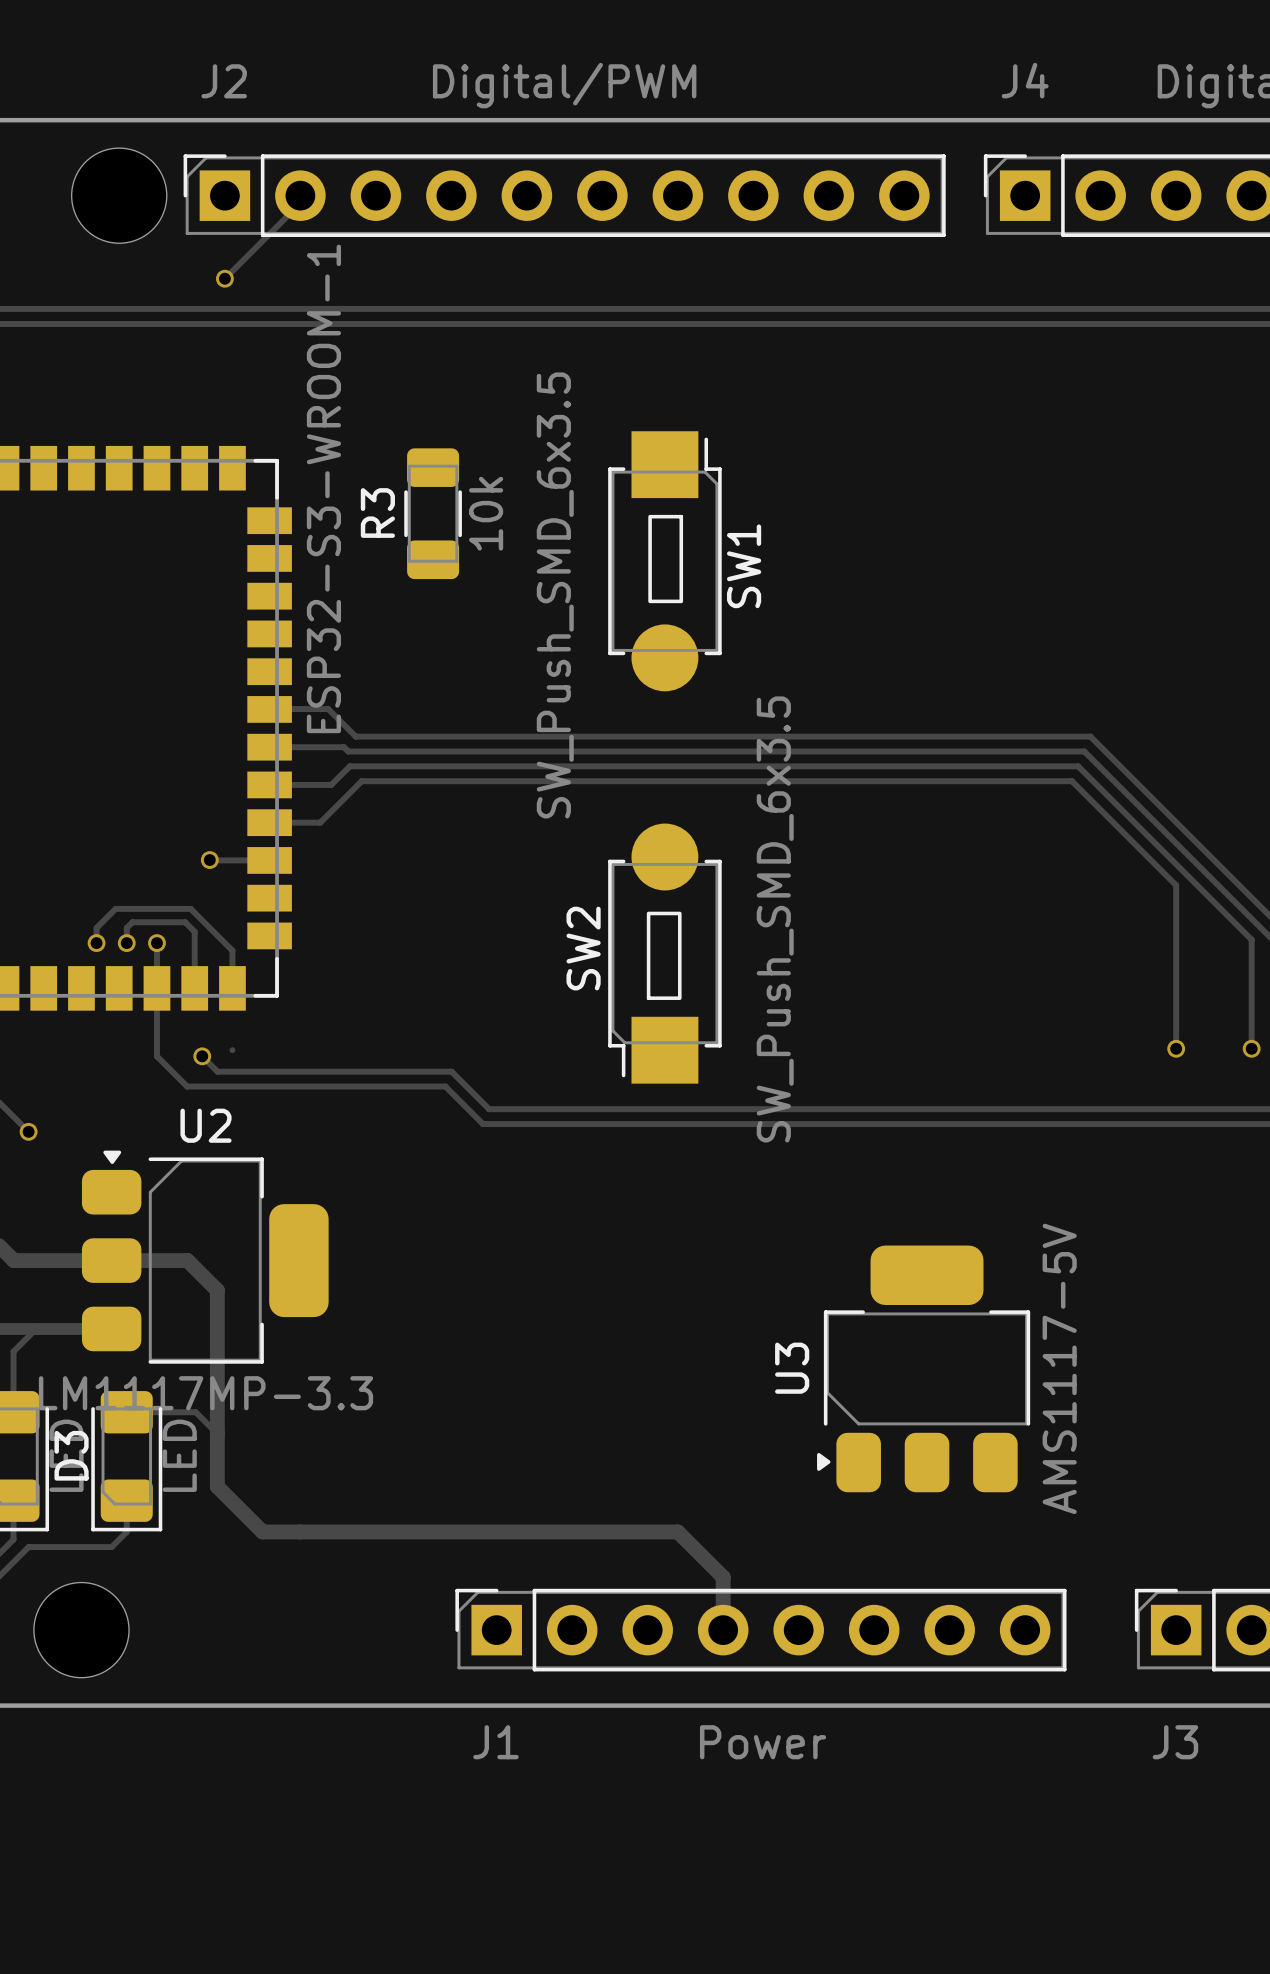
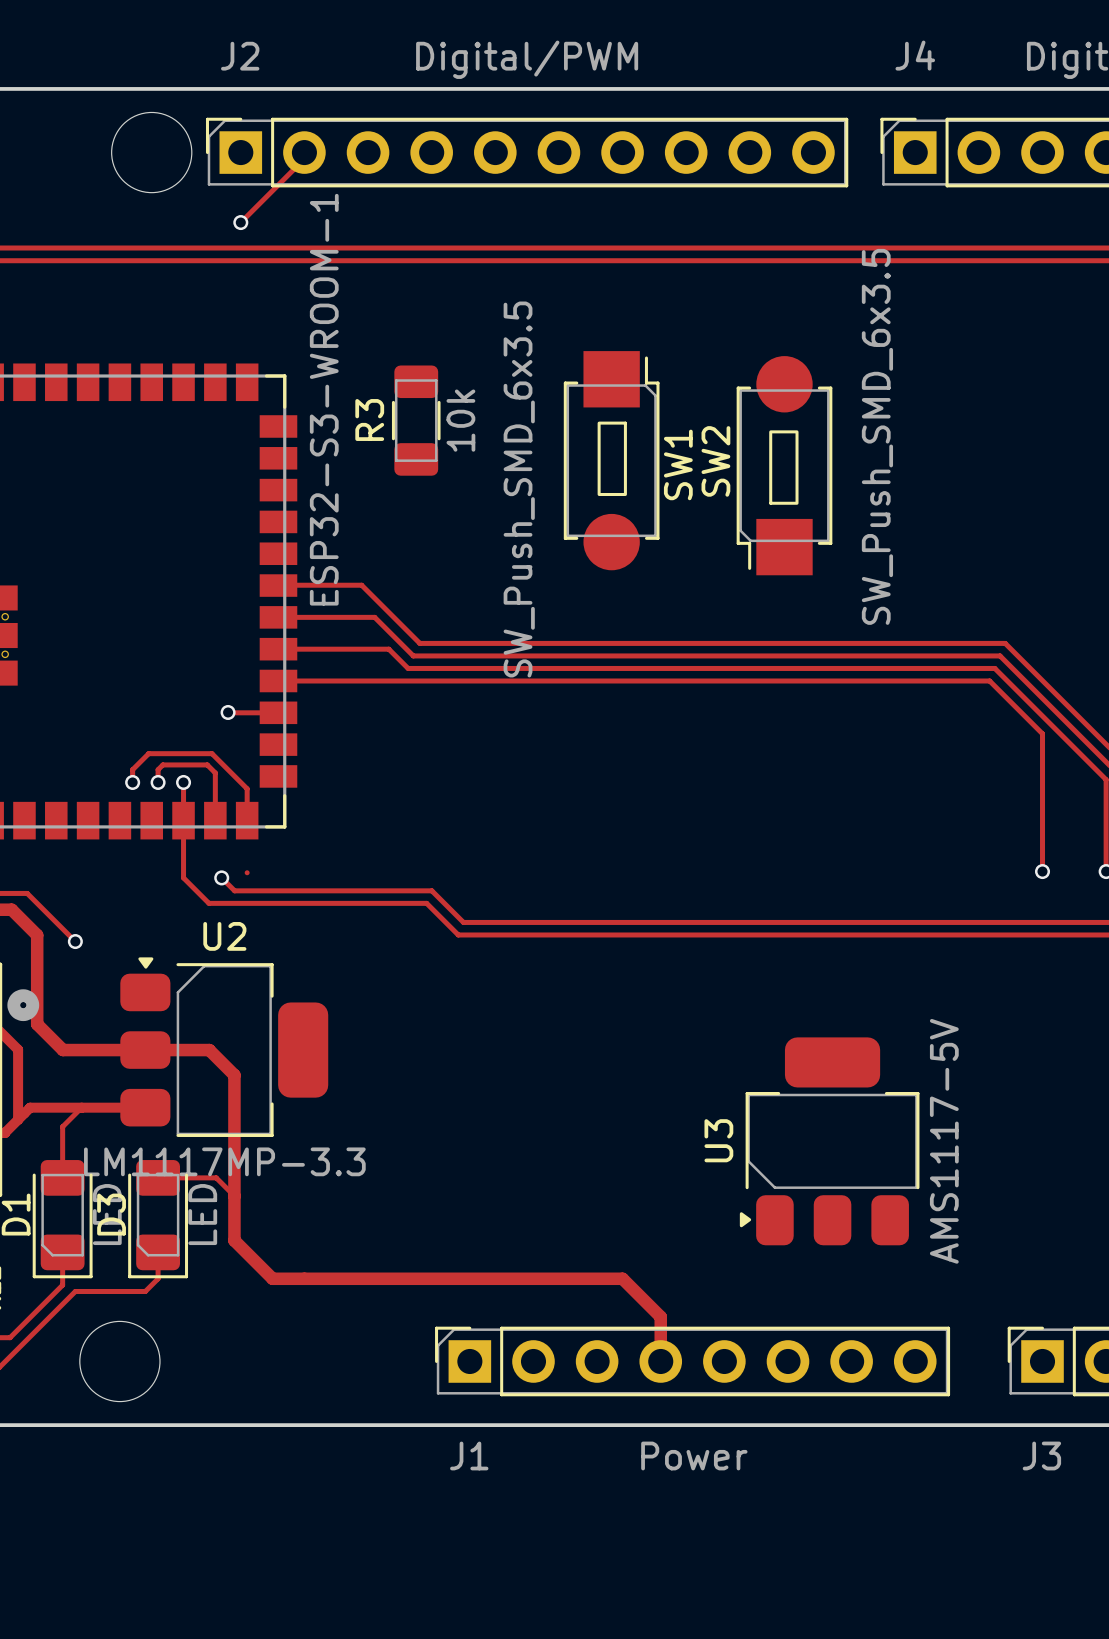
track: (328, 709) (355, 736) (1090, 736) (1131, 778) -> (327, 585) (361, 585) (419, 643) (1005, 643)
track: (343, 747) (348, 751) (1084, 751) (1125, 792) -> (341, 617) (374, 617) (413, 655) (1000, 655)
track: (331, 784) (349, 766) (1078, 766) (1119, 807) -> (330, 649) (388, 649) (408, 668) (994, 668)
track: (320, 822) (361, 781) (1072, 781) (1113, 822) -> (321, 680) (989, 680)
SW2 position: (664, 953) -> (784, 465)

